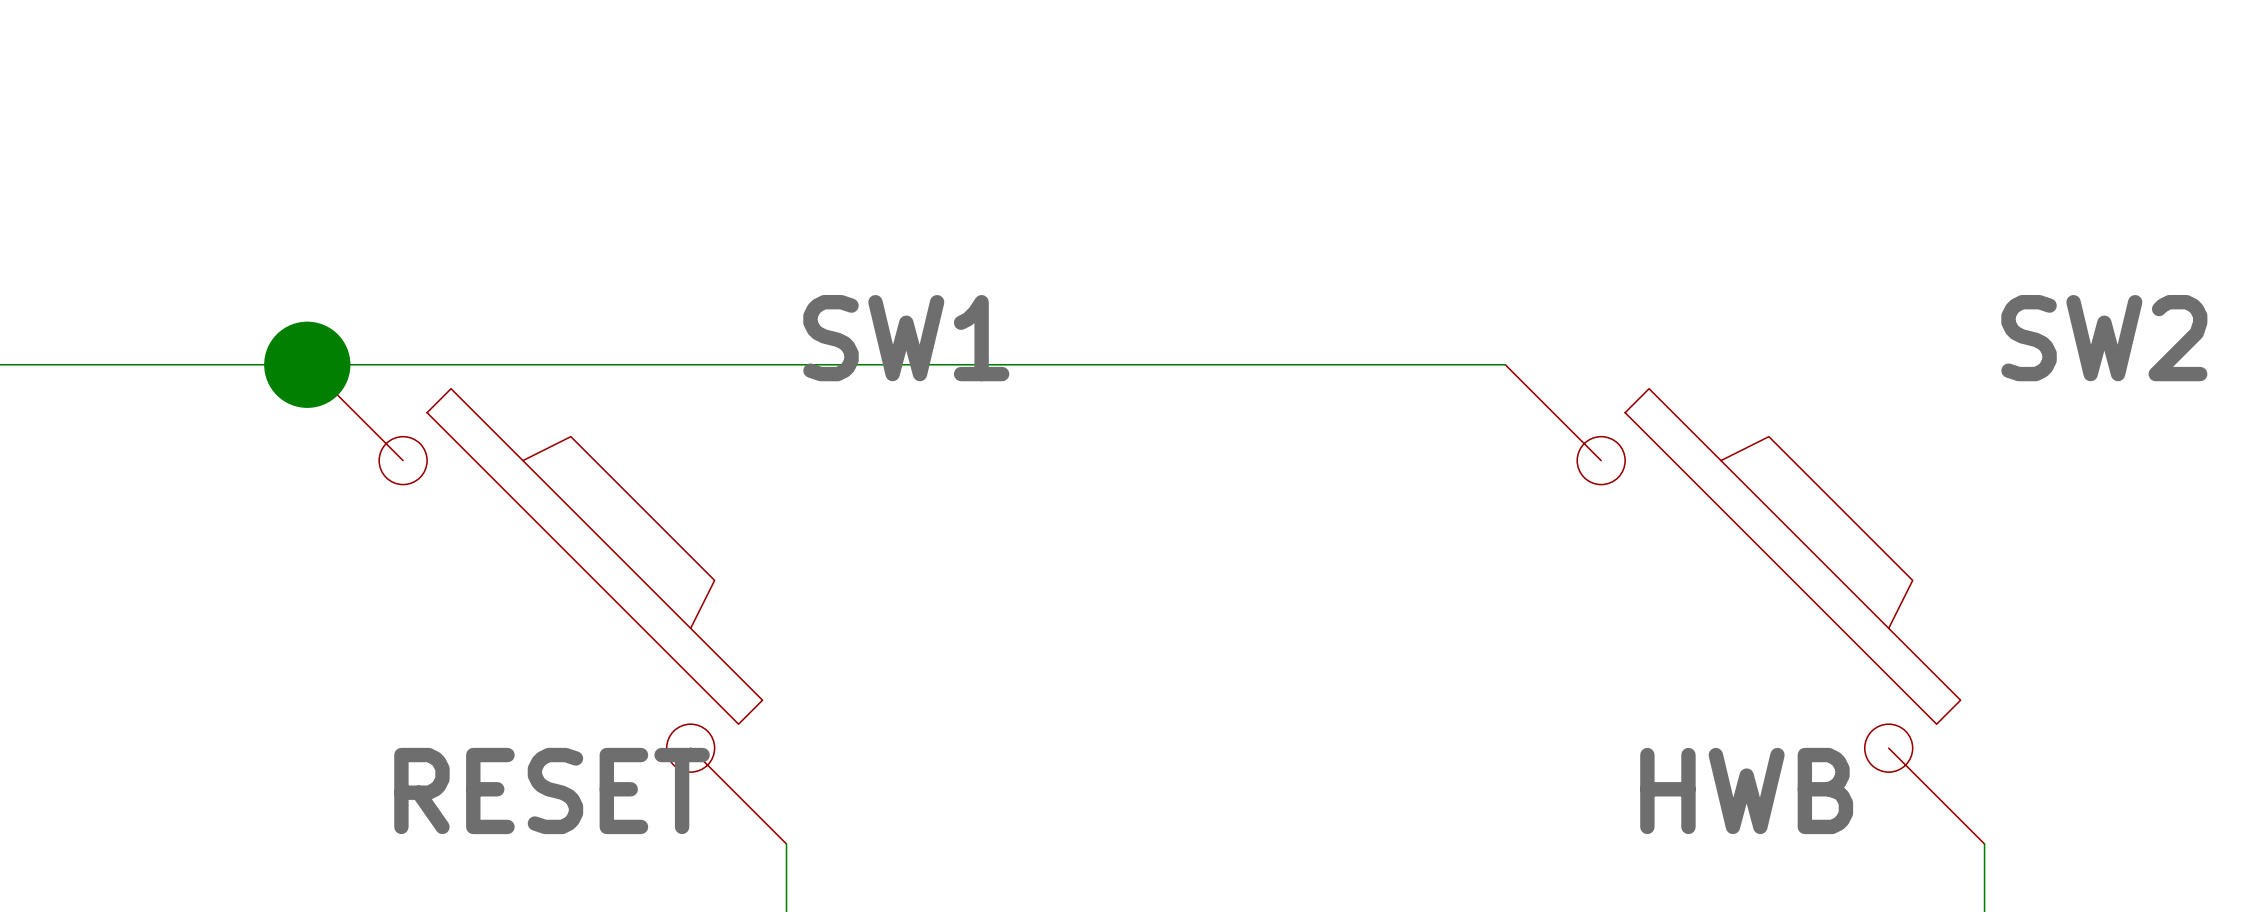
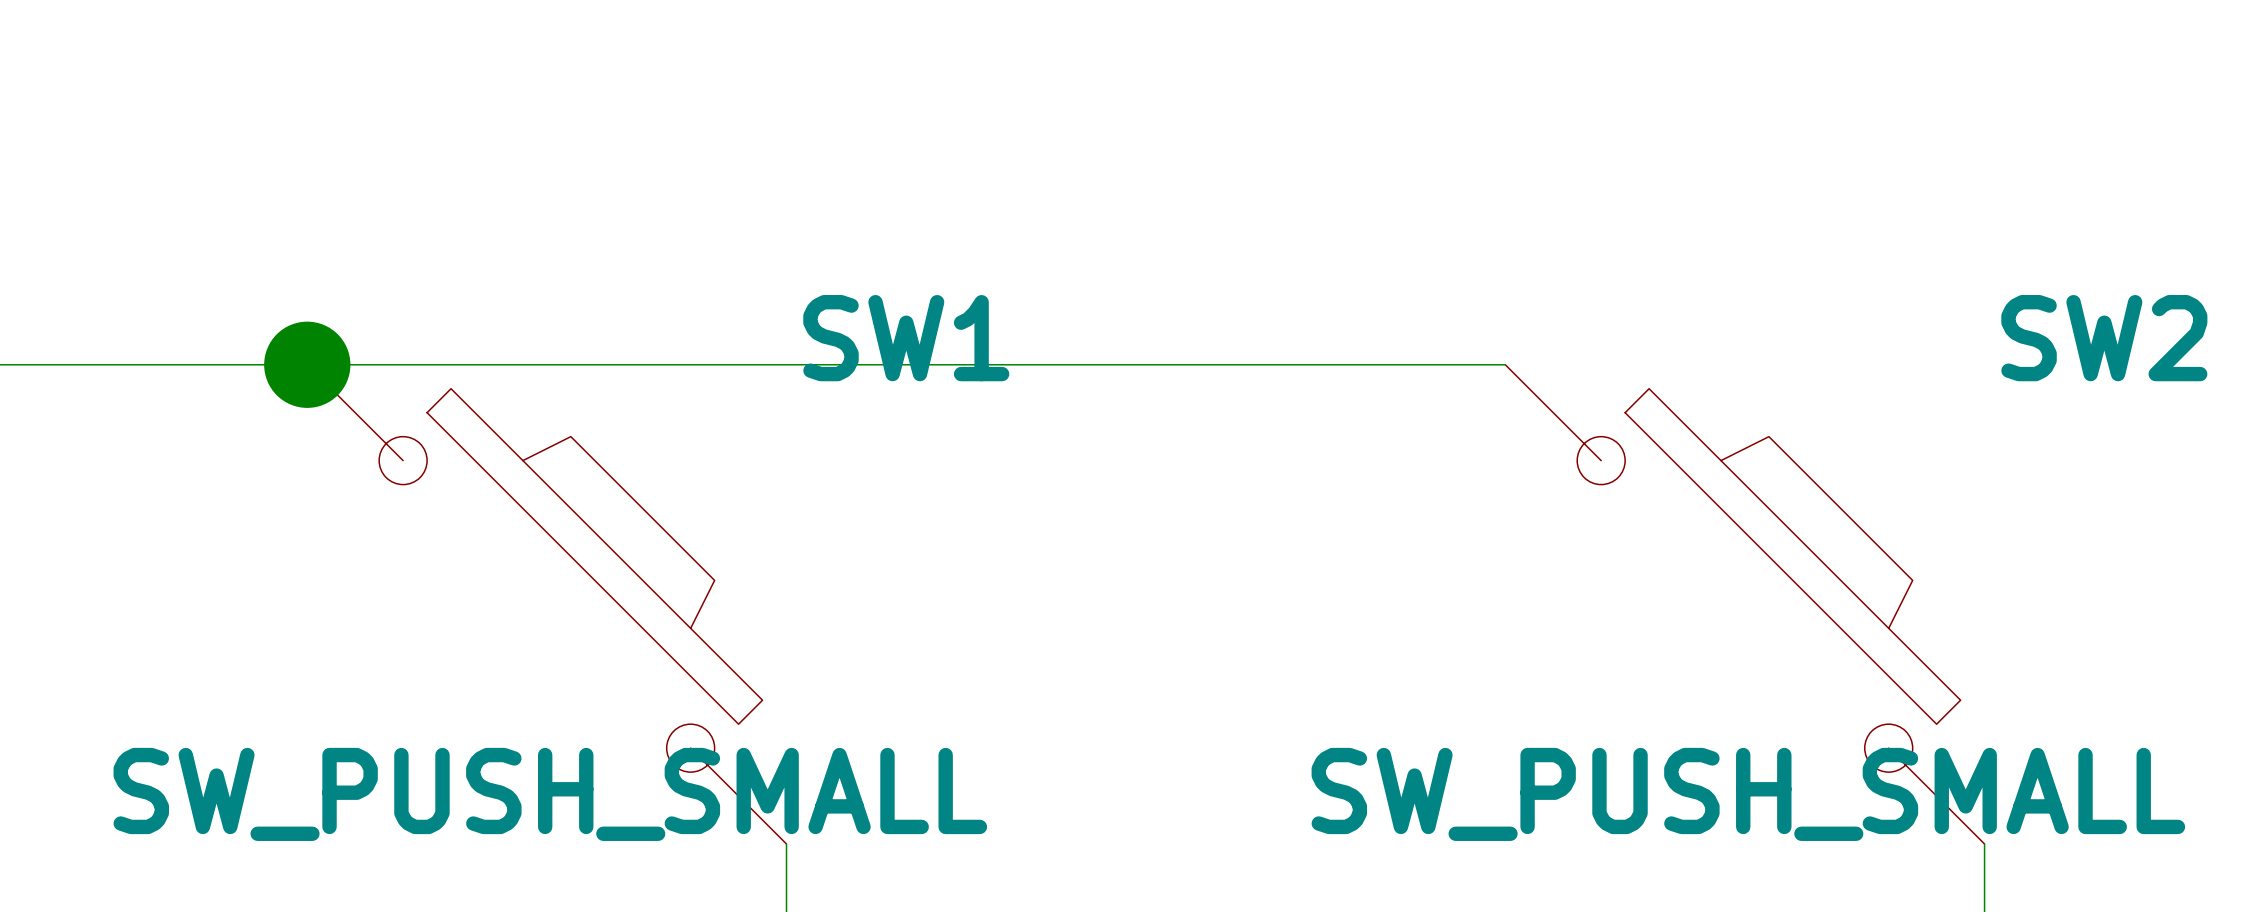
SW1 value: RESET (552, 790) -> SW_PUSH_SMALL (550, 794)
SW2 value: HWB (1746, 790) -> SW_PUSH_SMALL (1748, 794)

